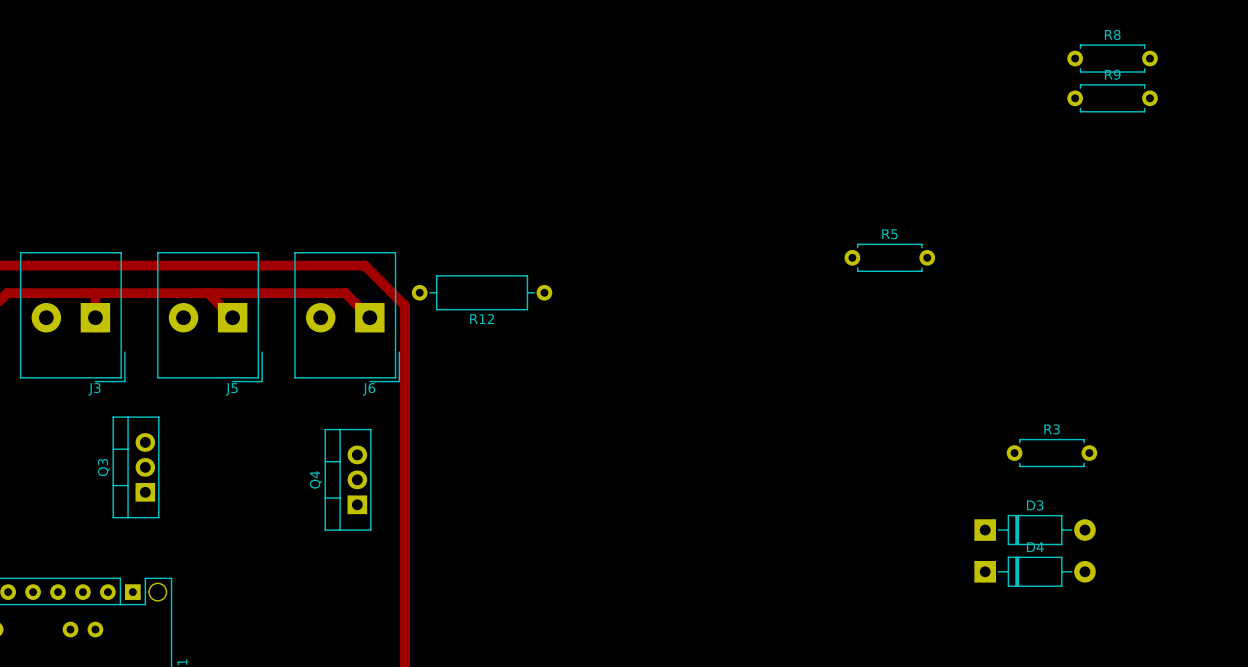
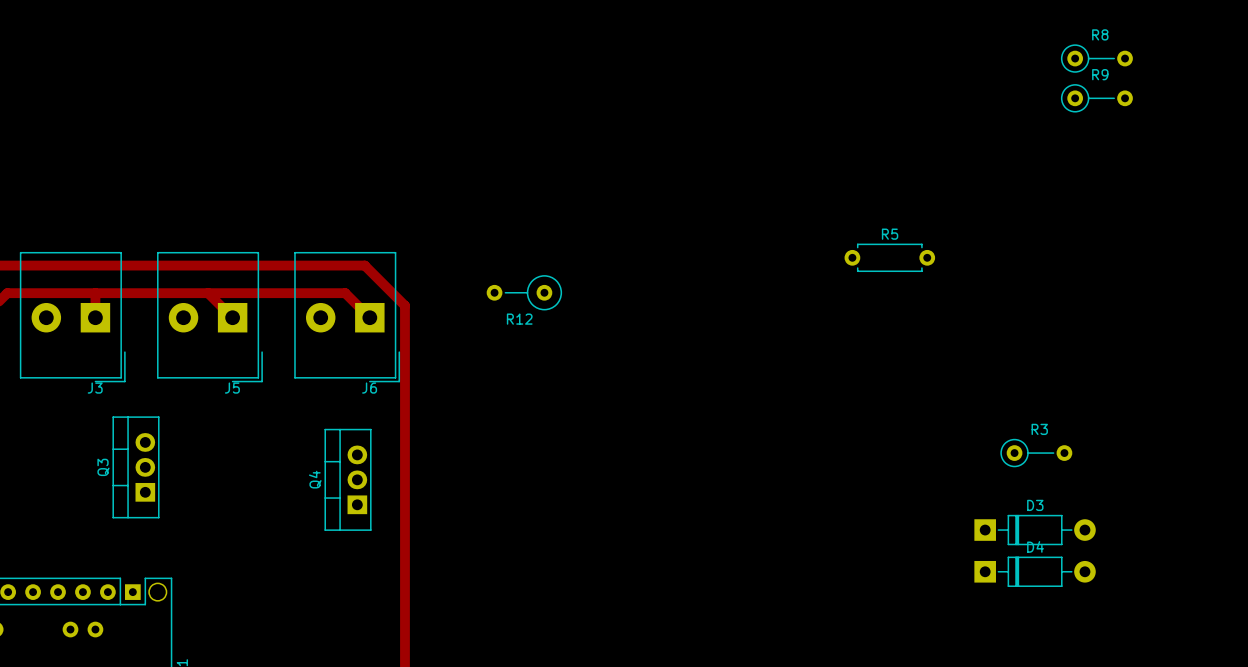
R8 footprint: [1067, 44, 1158, 73] -> [1061, 44, 1133, 73]
R9 footprint: [1067, 84, 1158, 113] -> [1061, 84, 1133, 113]
R12 footprint: [411, 275, 553, 311] -> [486, 275, 562, 311]
R3 footprint: [1006, 439, 1098, 468] -> [1000, 439, 1073, 468]

